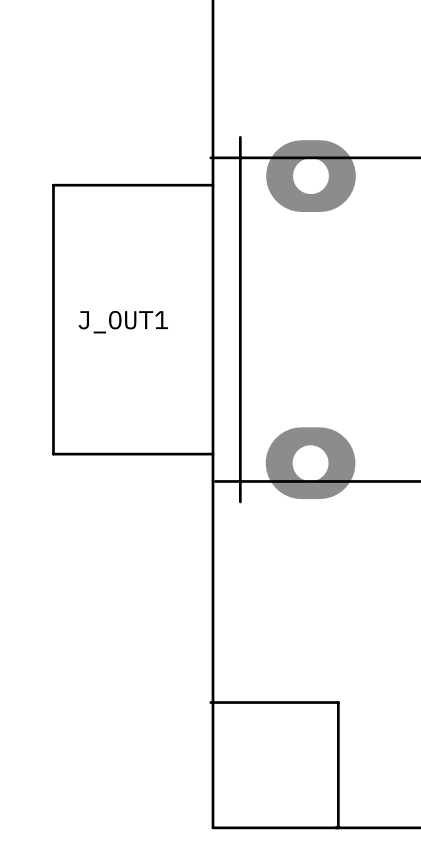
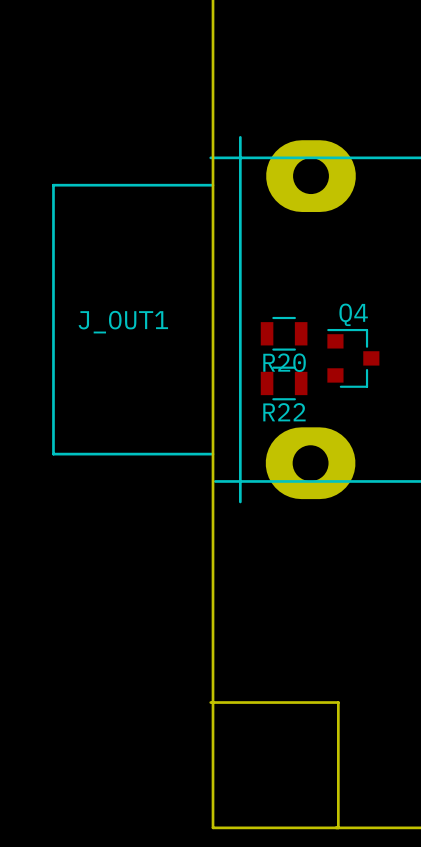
R20: none -> (284, 333)
Q4: none -> (353, 358)
R22: none -> (284, 383)

